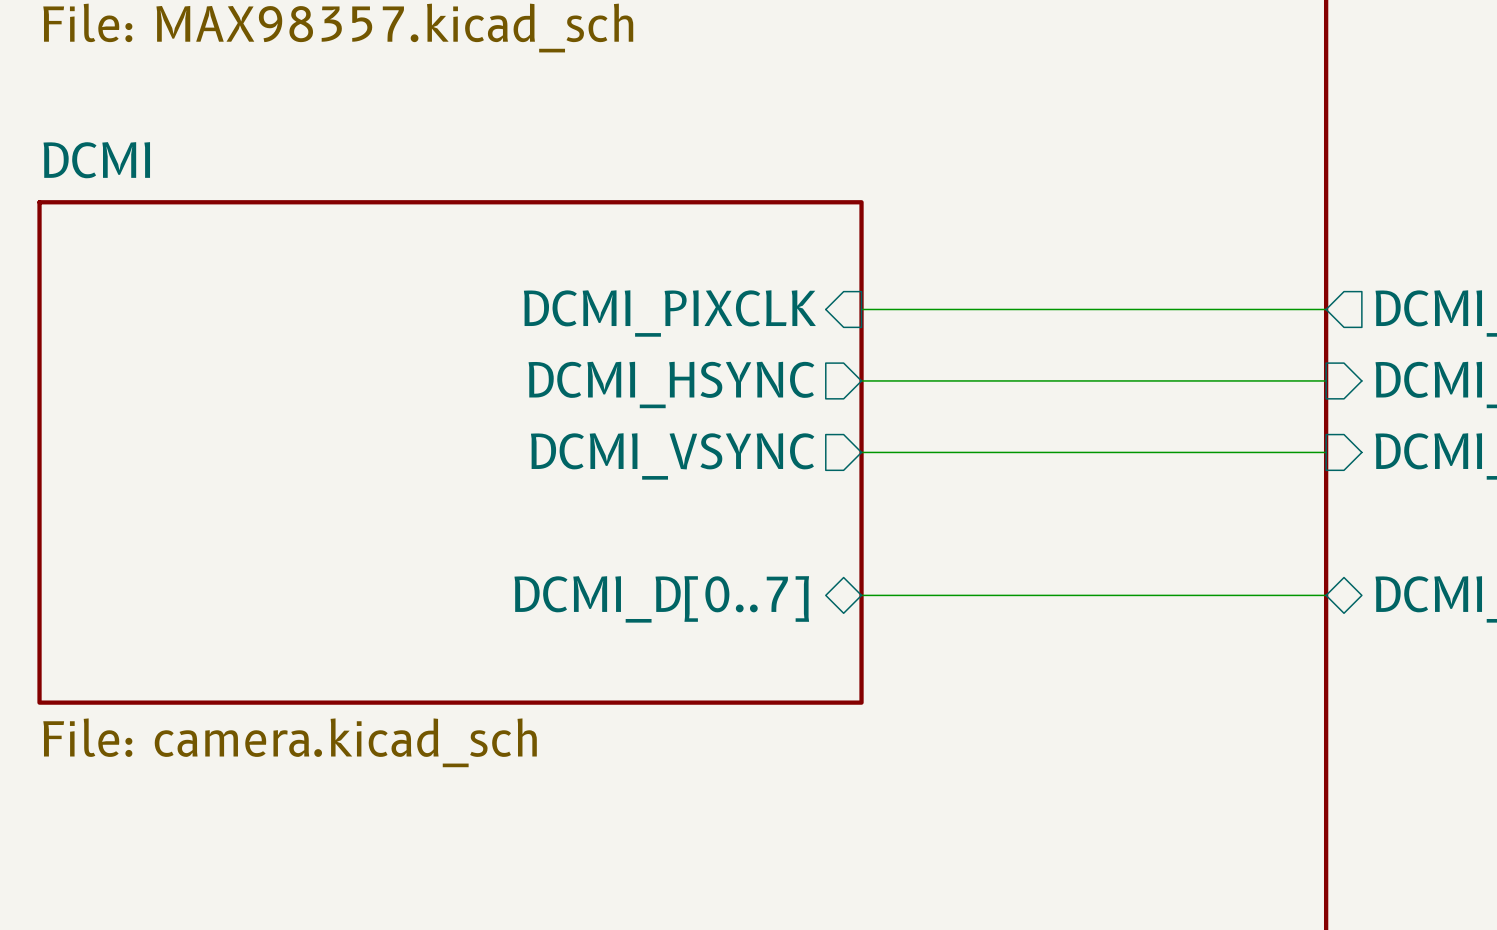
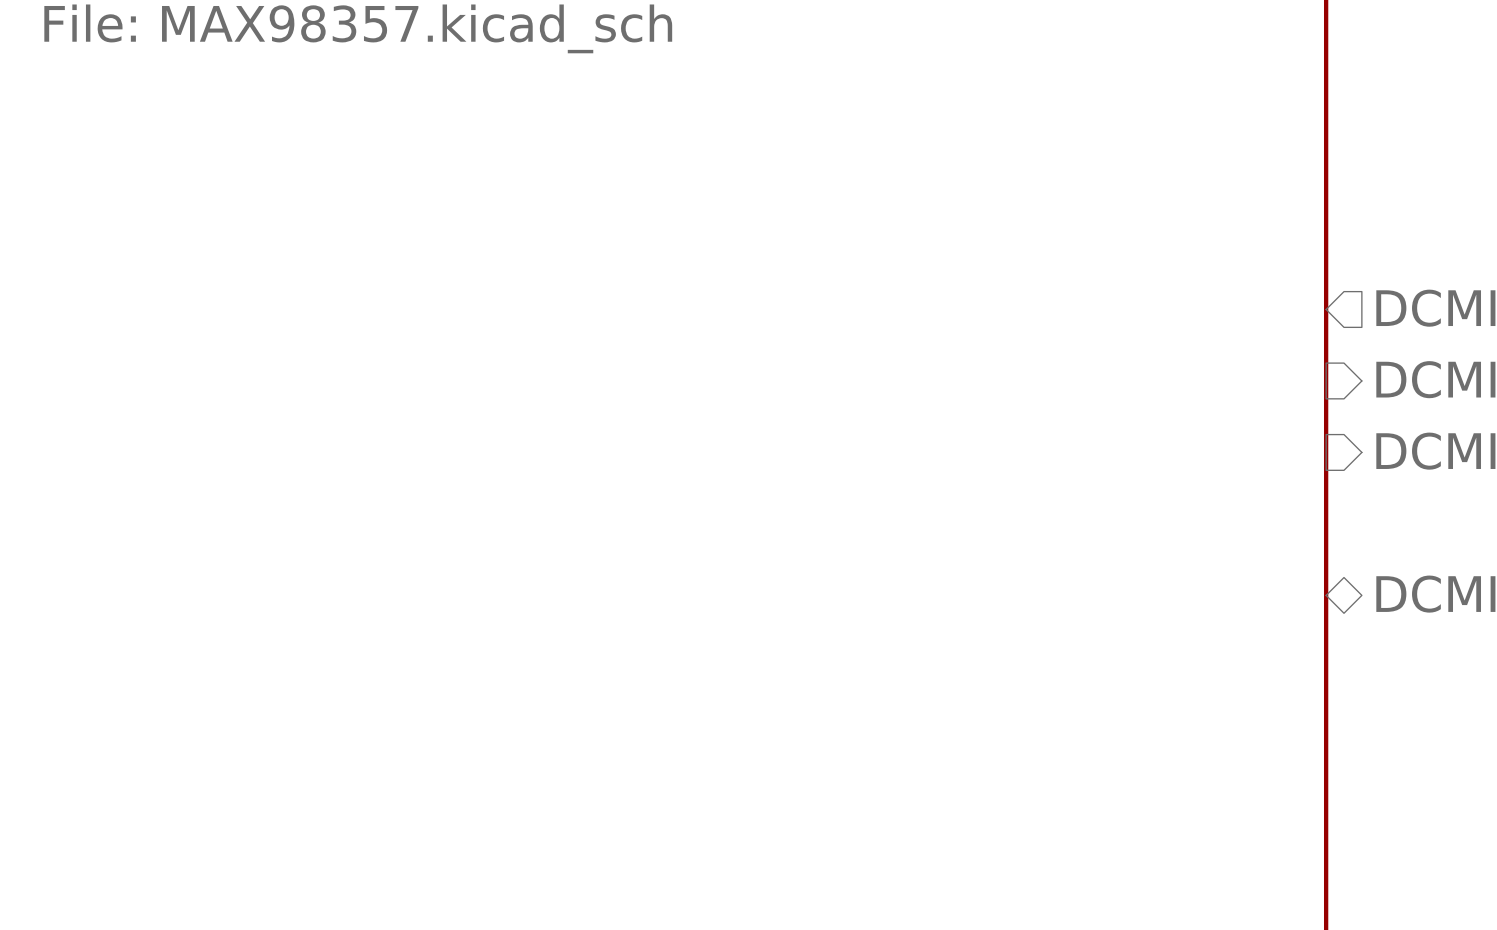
wire: (861, 309) (1326, 309) -> none
sheet pin: DCMI_PIXCLK (669, 313) -> none
wire: (861, 380) (1326, 380) -> none
sheet pin: DCMI_HSYNC (671, 384) -> none
sheet DCMI: File: camera.kicad_sch (450, 452) -> none
wire: (861, 452) (1326, 452) -> none
sheet pin: DCMI_VSYNC (672, 456) -> none
wire: (861, 595) (1326, 595) -> none
sheet pin: DCMI_D[0..7] (661, 599) -> none

